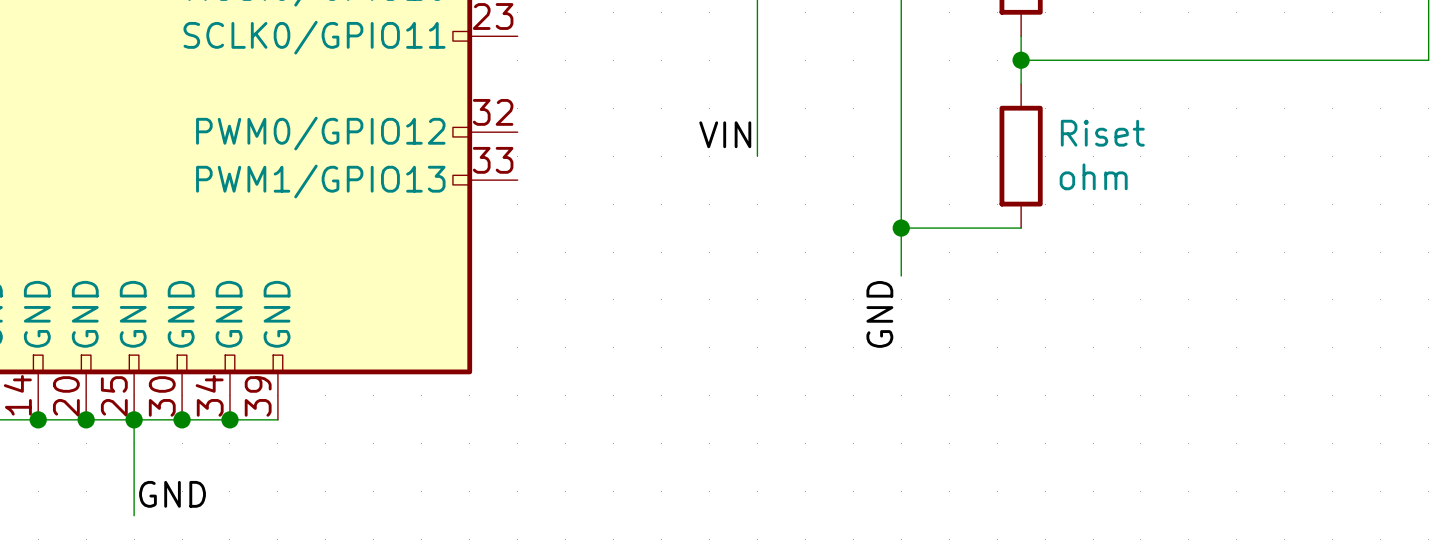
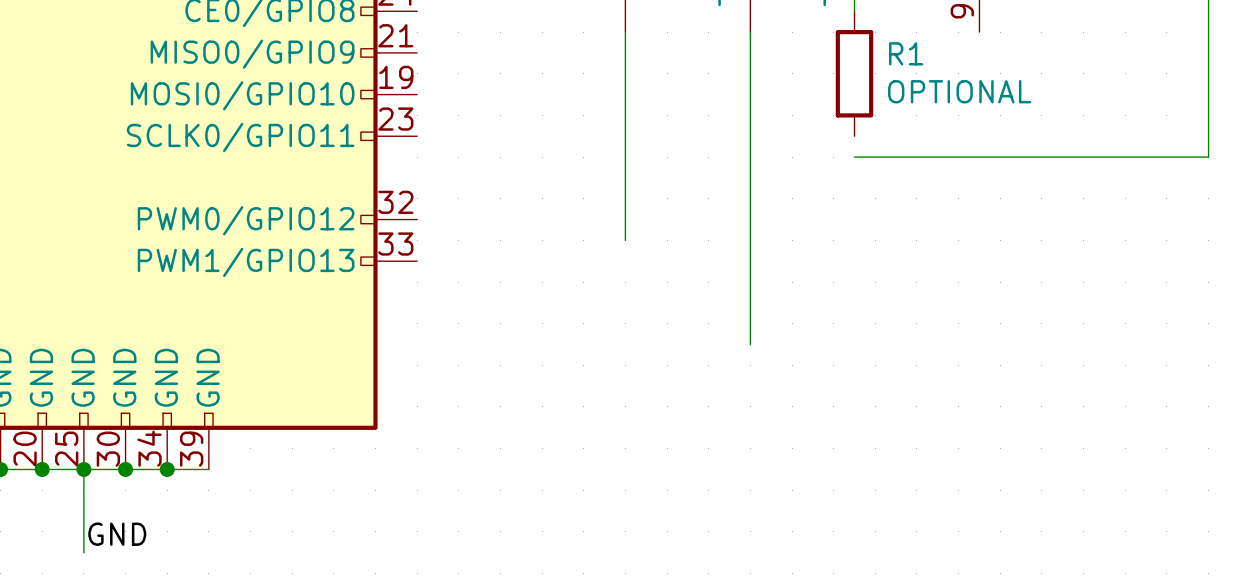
wire: (1021, 36) (1021, 84) -> none
junction: (1021, 60) -> none
label: VIN (725, 134) -> none
Riset: ohm (1021, 156) -> none
wire: (901, 228) (1021, 228) -> none
junction: (901, 228) -> none
label: GND (879, 314) -> none

